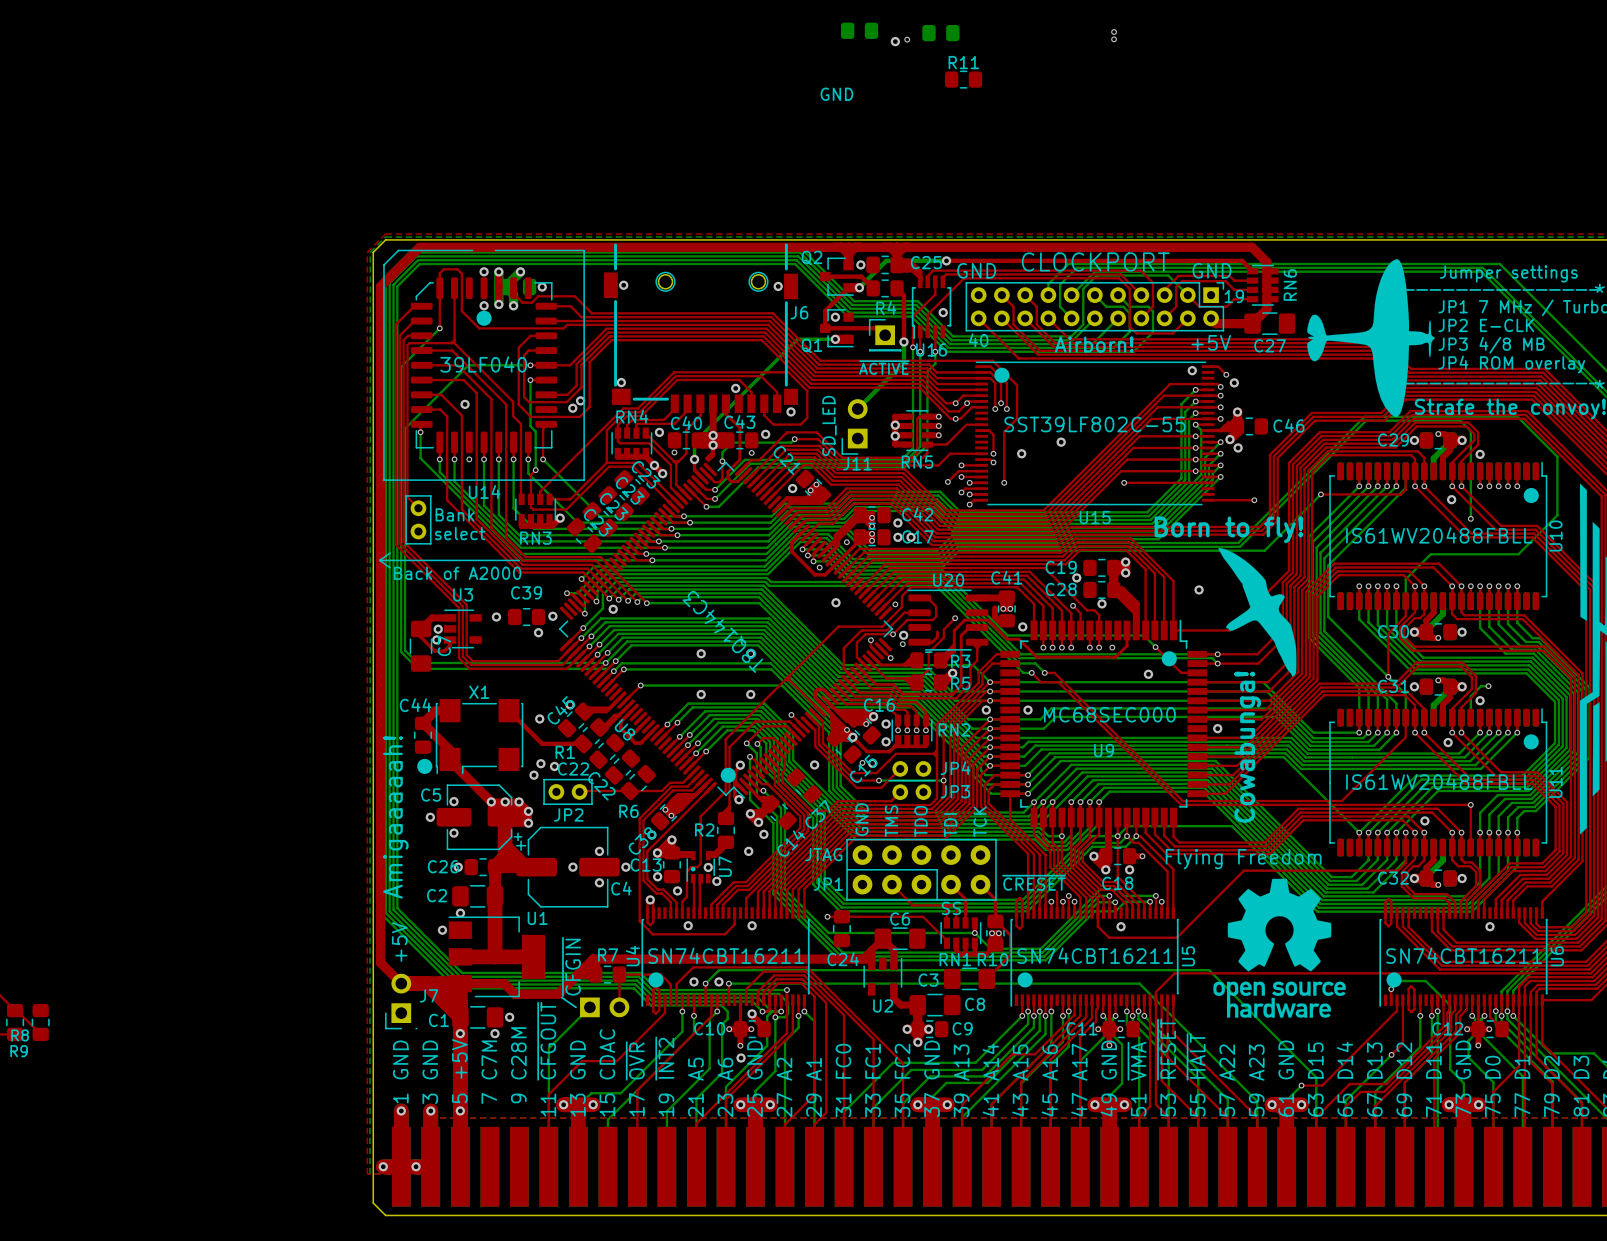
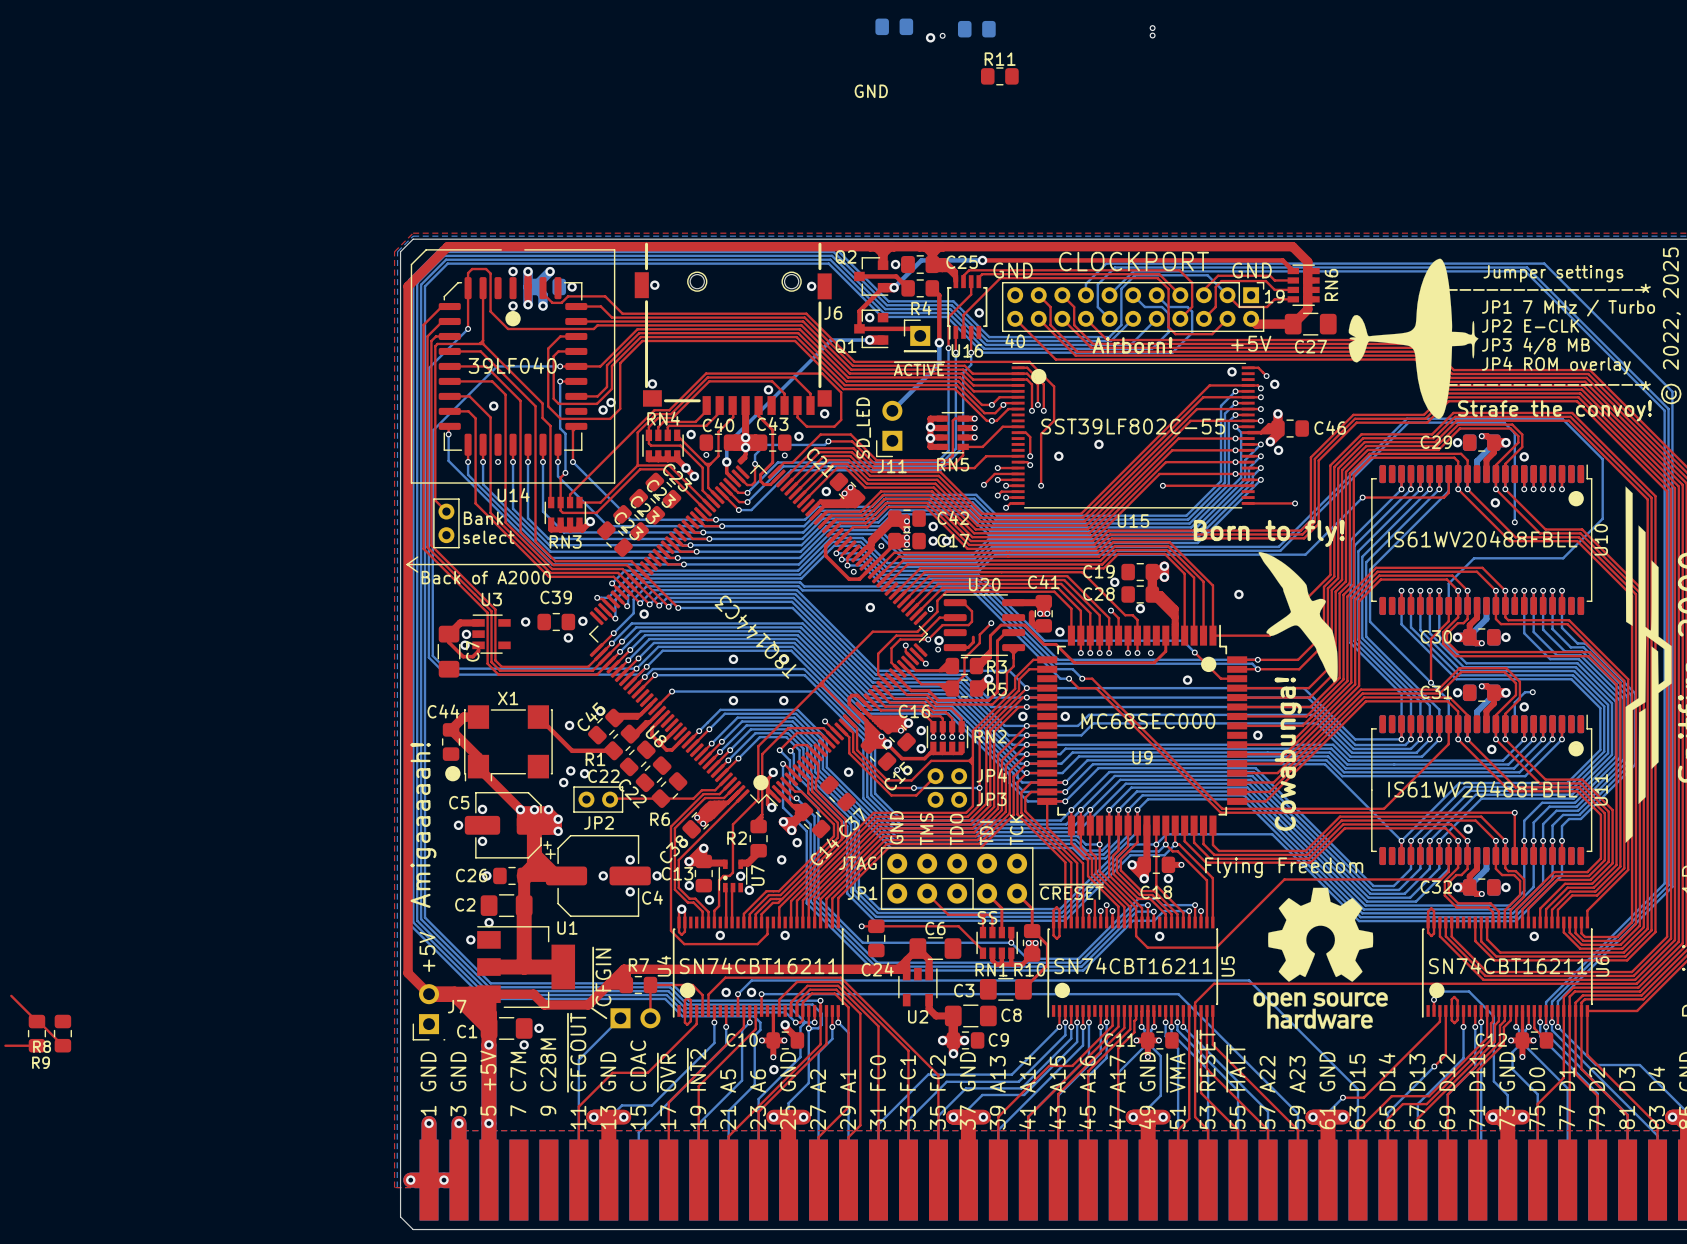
top track: (900, 792) (891, 801) (837, 801) (828, 810) (810, 810) -> (841, 839) (845, 835) (844, 818)
top track: none -> (782, 899) (778, 902) (772, 902) (761, 914) (761, 922)
top track: none -> (755, 1010) (755, 1029) (698, 1086) (698, 1180)

